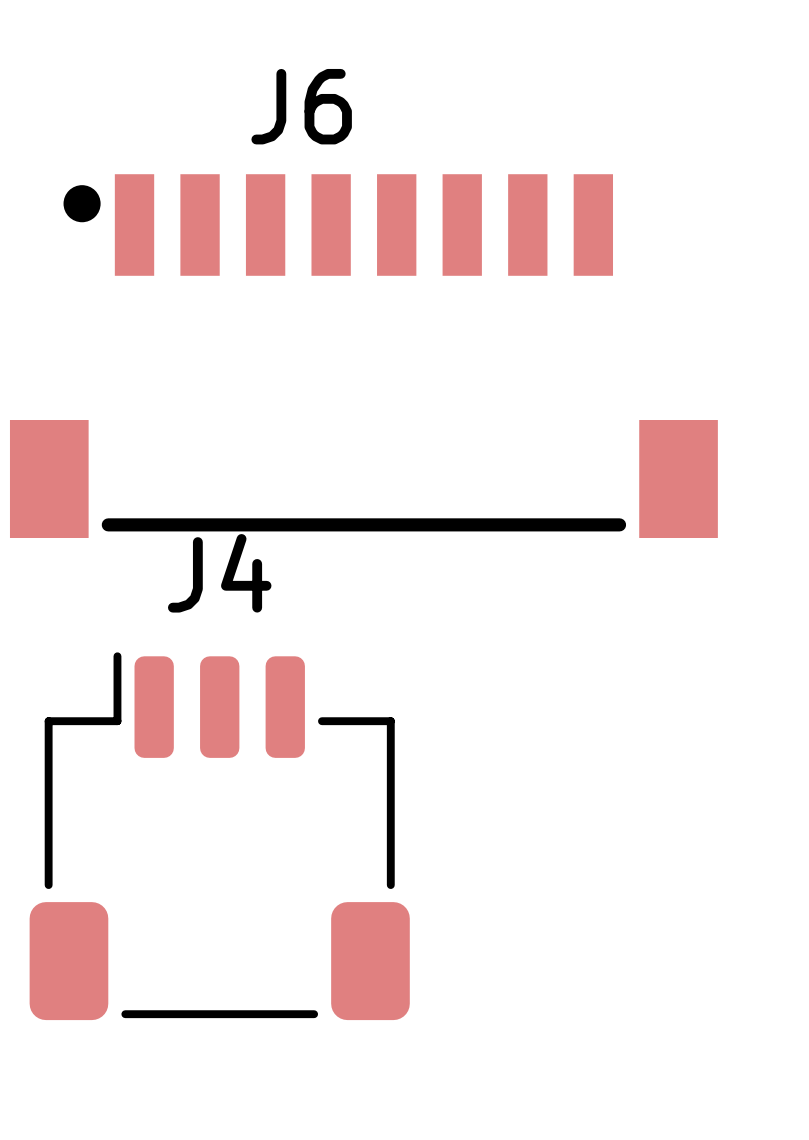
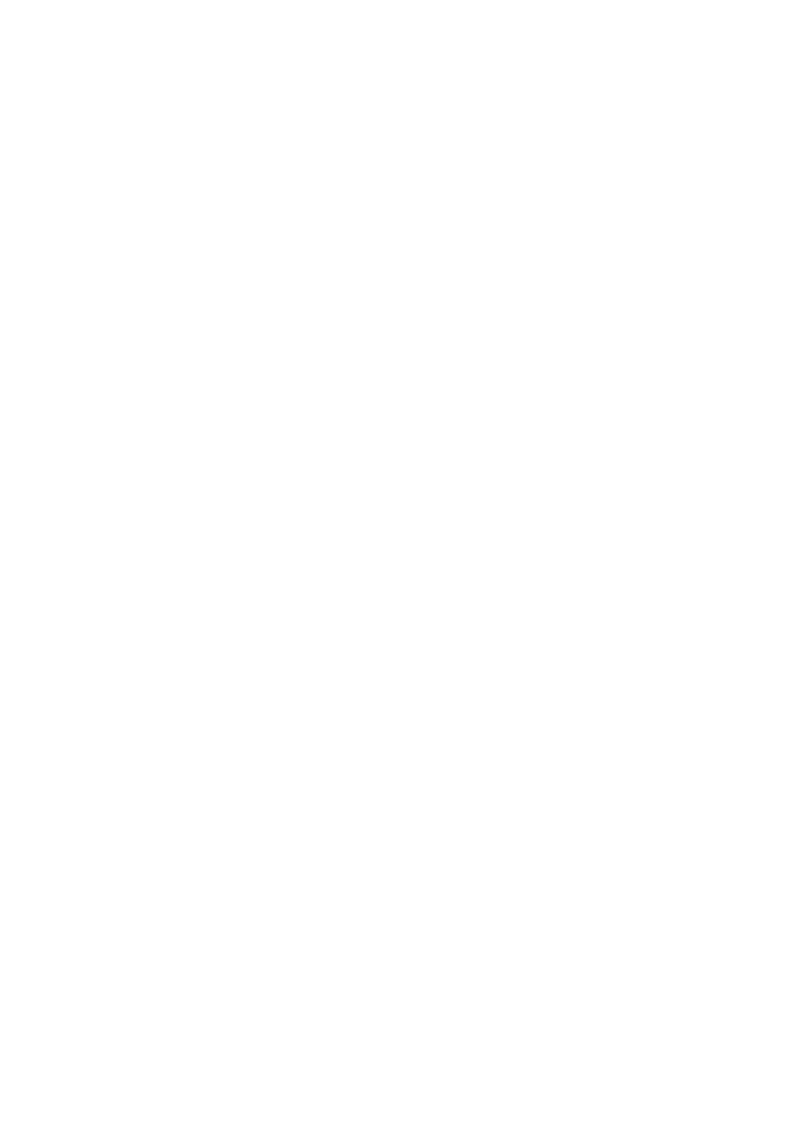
J6: (363, 356) -> none
J4: (219, 836) -> none

